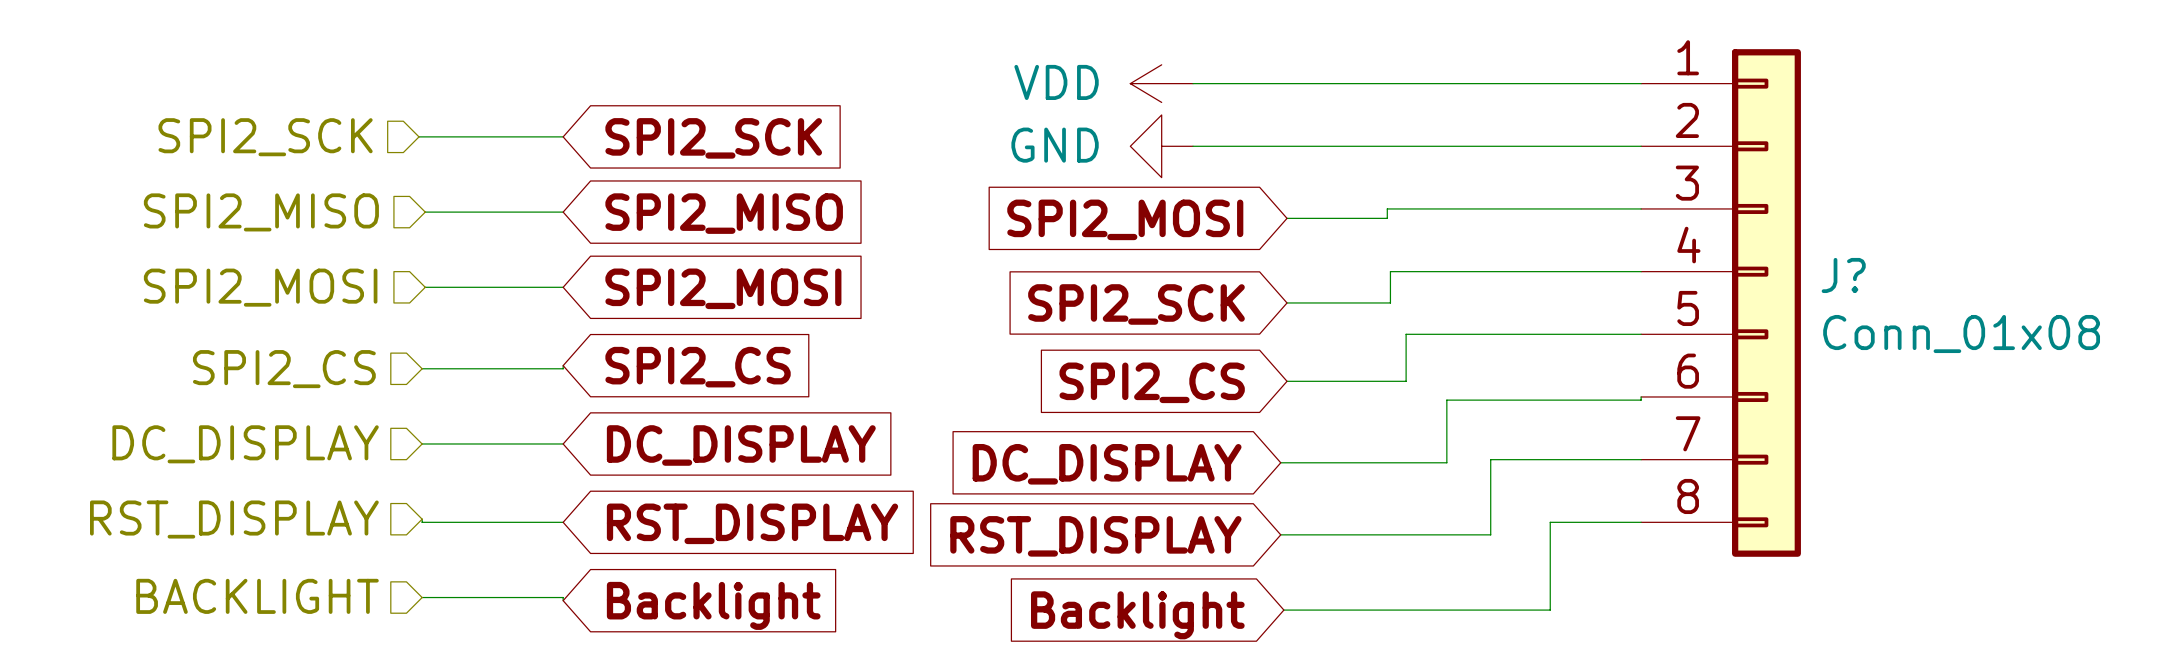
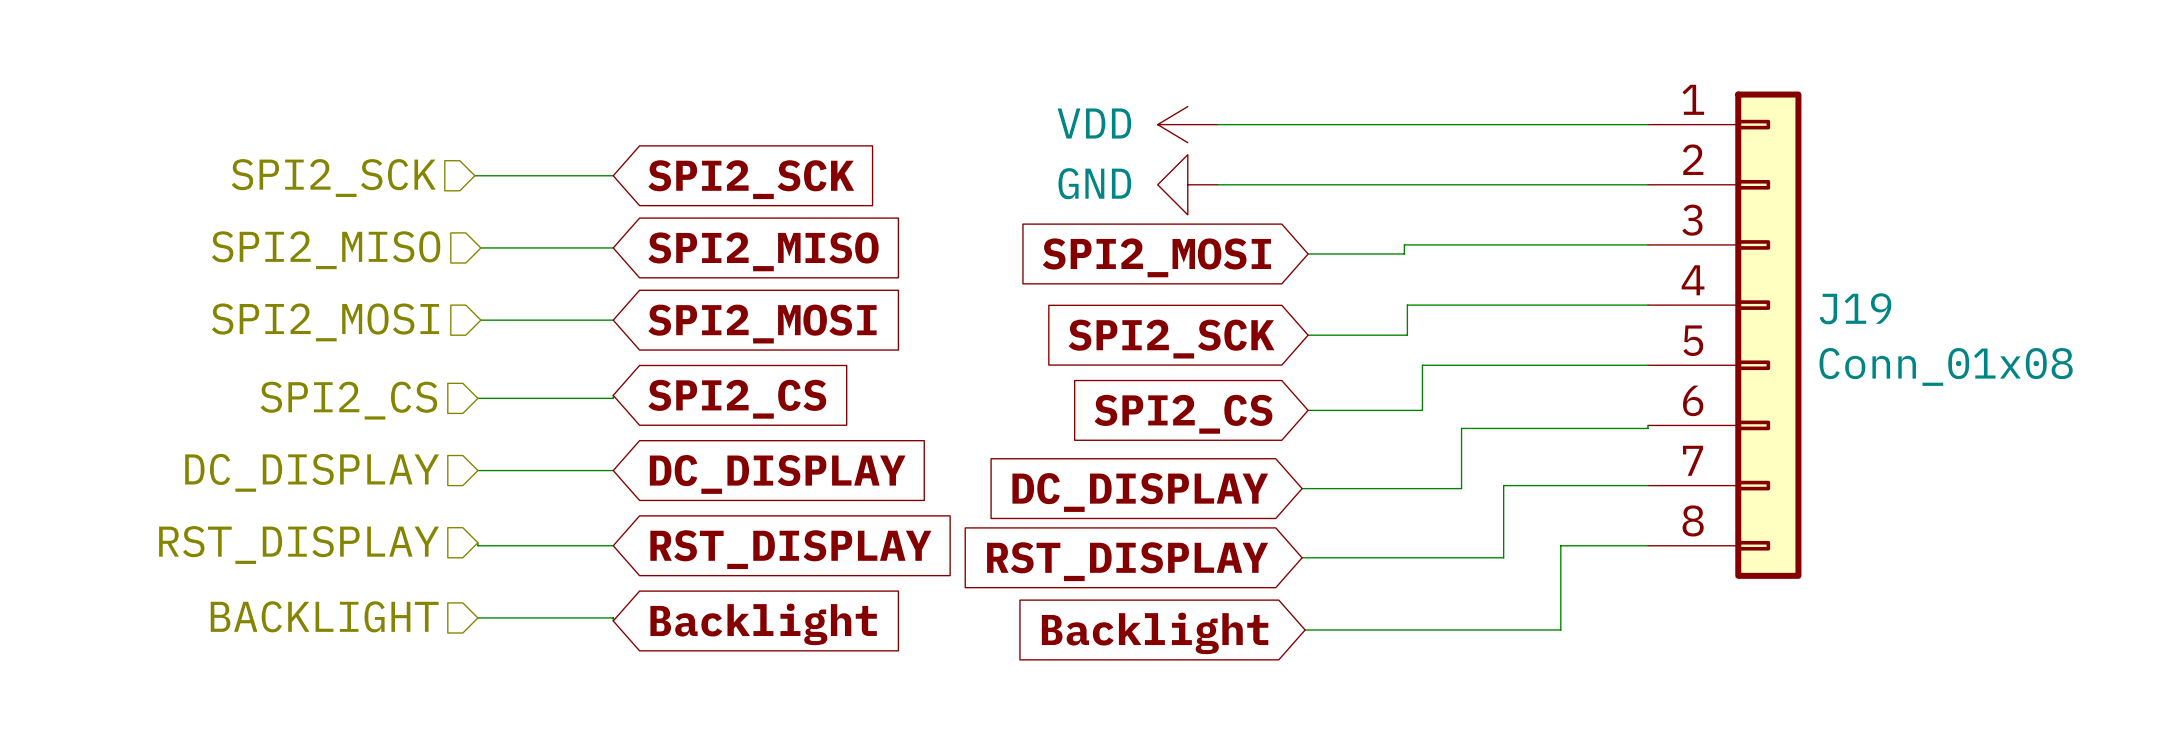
J? name: J? (1843, 275) -> J19 (1855, 308)

